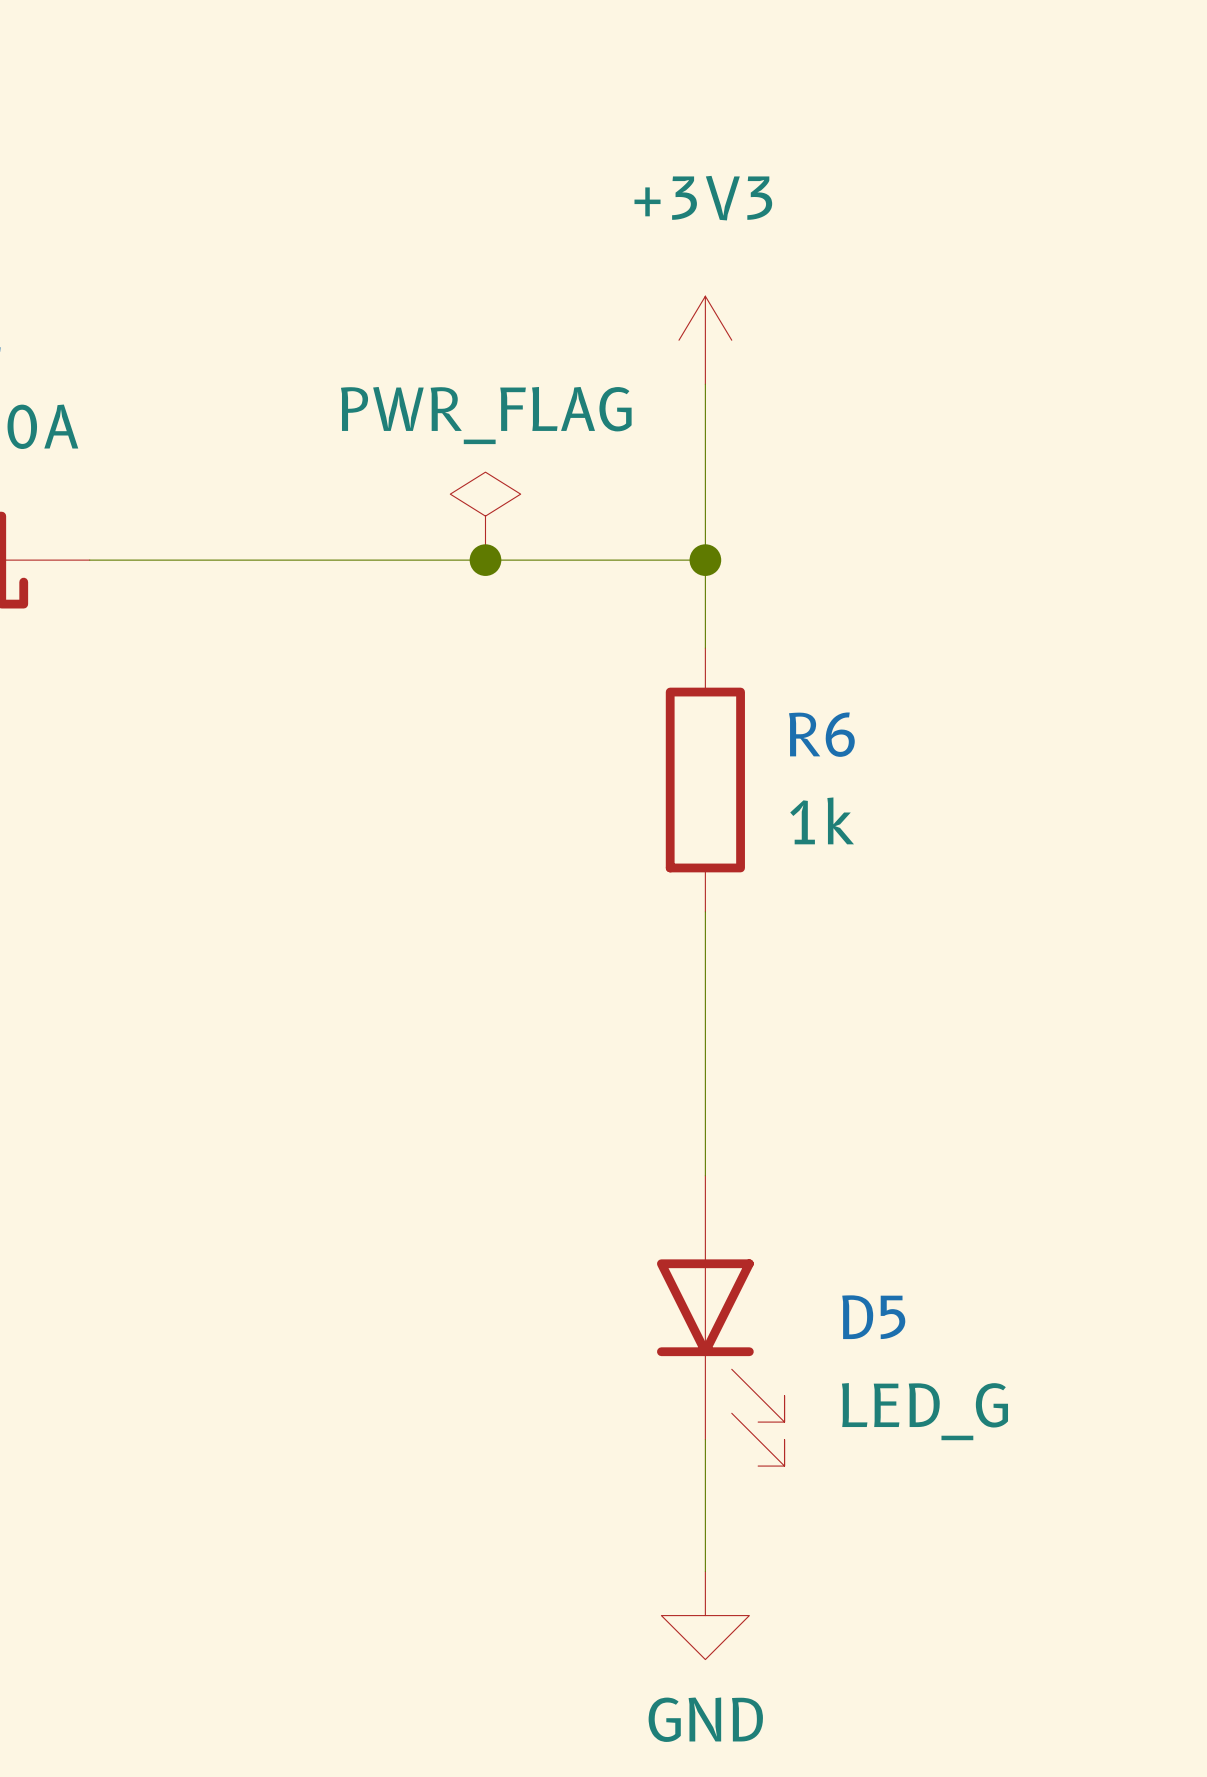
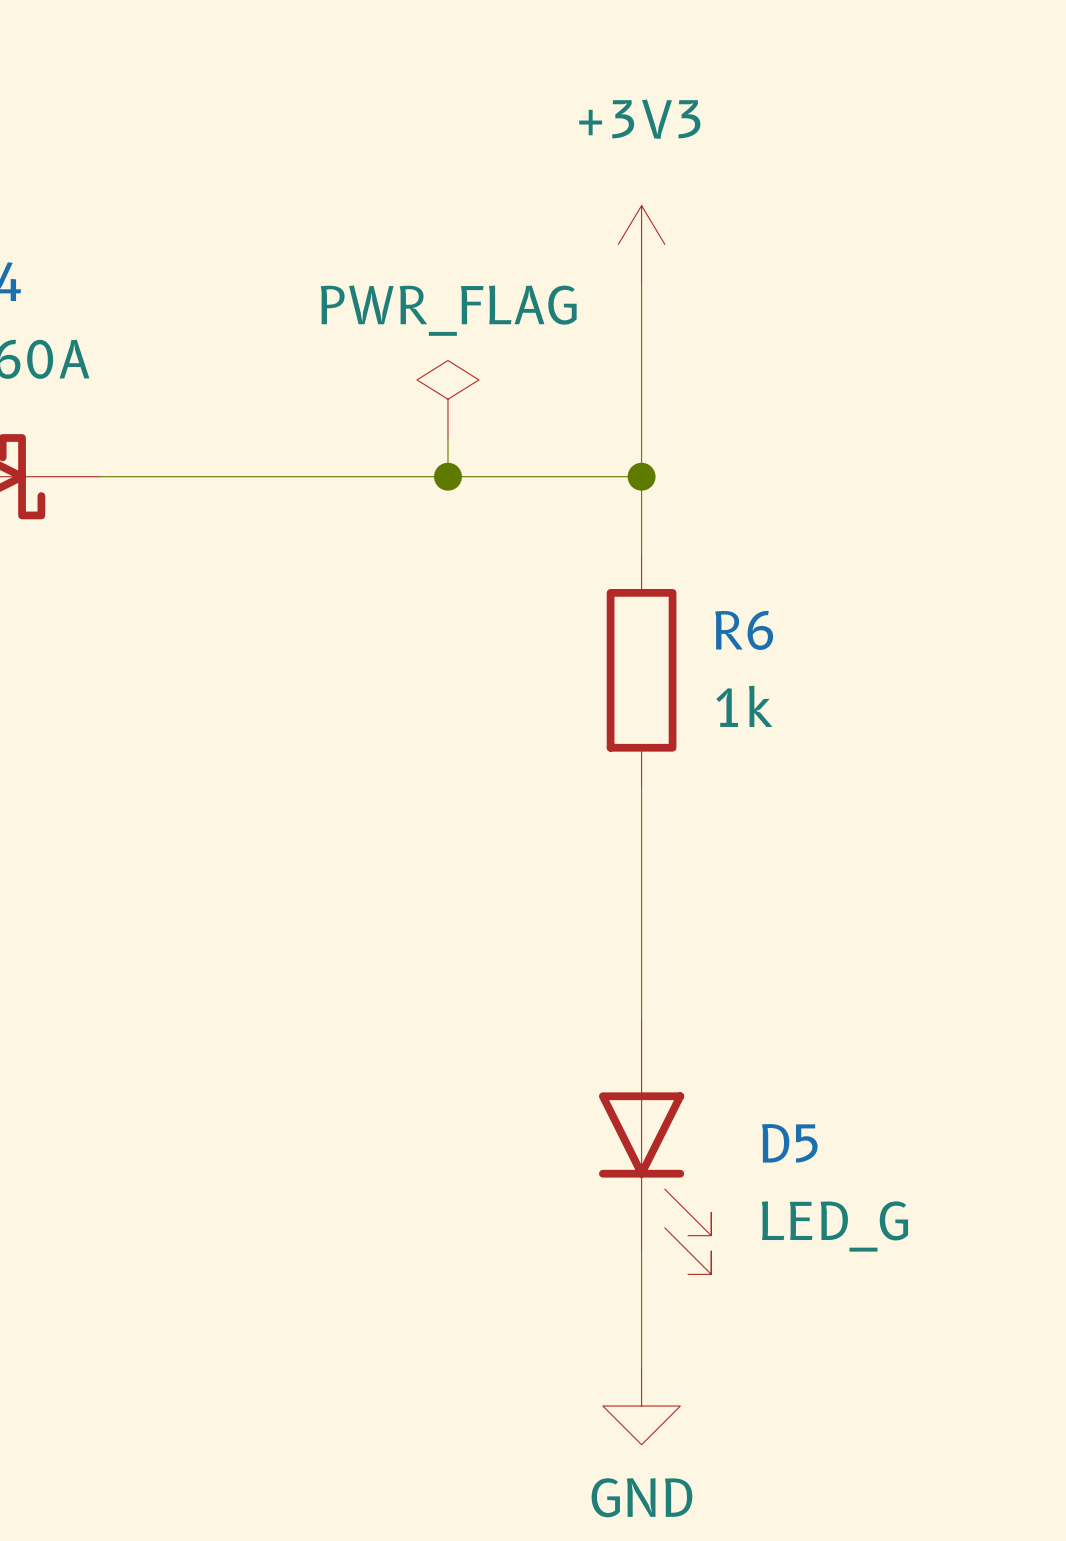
power symbol position: +3V3 (705, 340) -> +3V3 (641, 244)
power symbol position: PWR_FLAG (485, 516) -> PWR_FLAG (447, 399)

